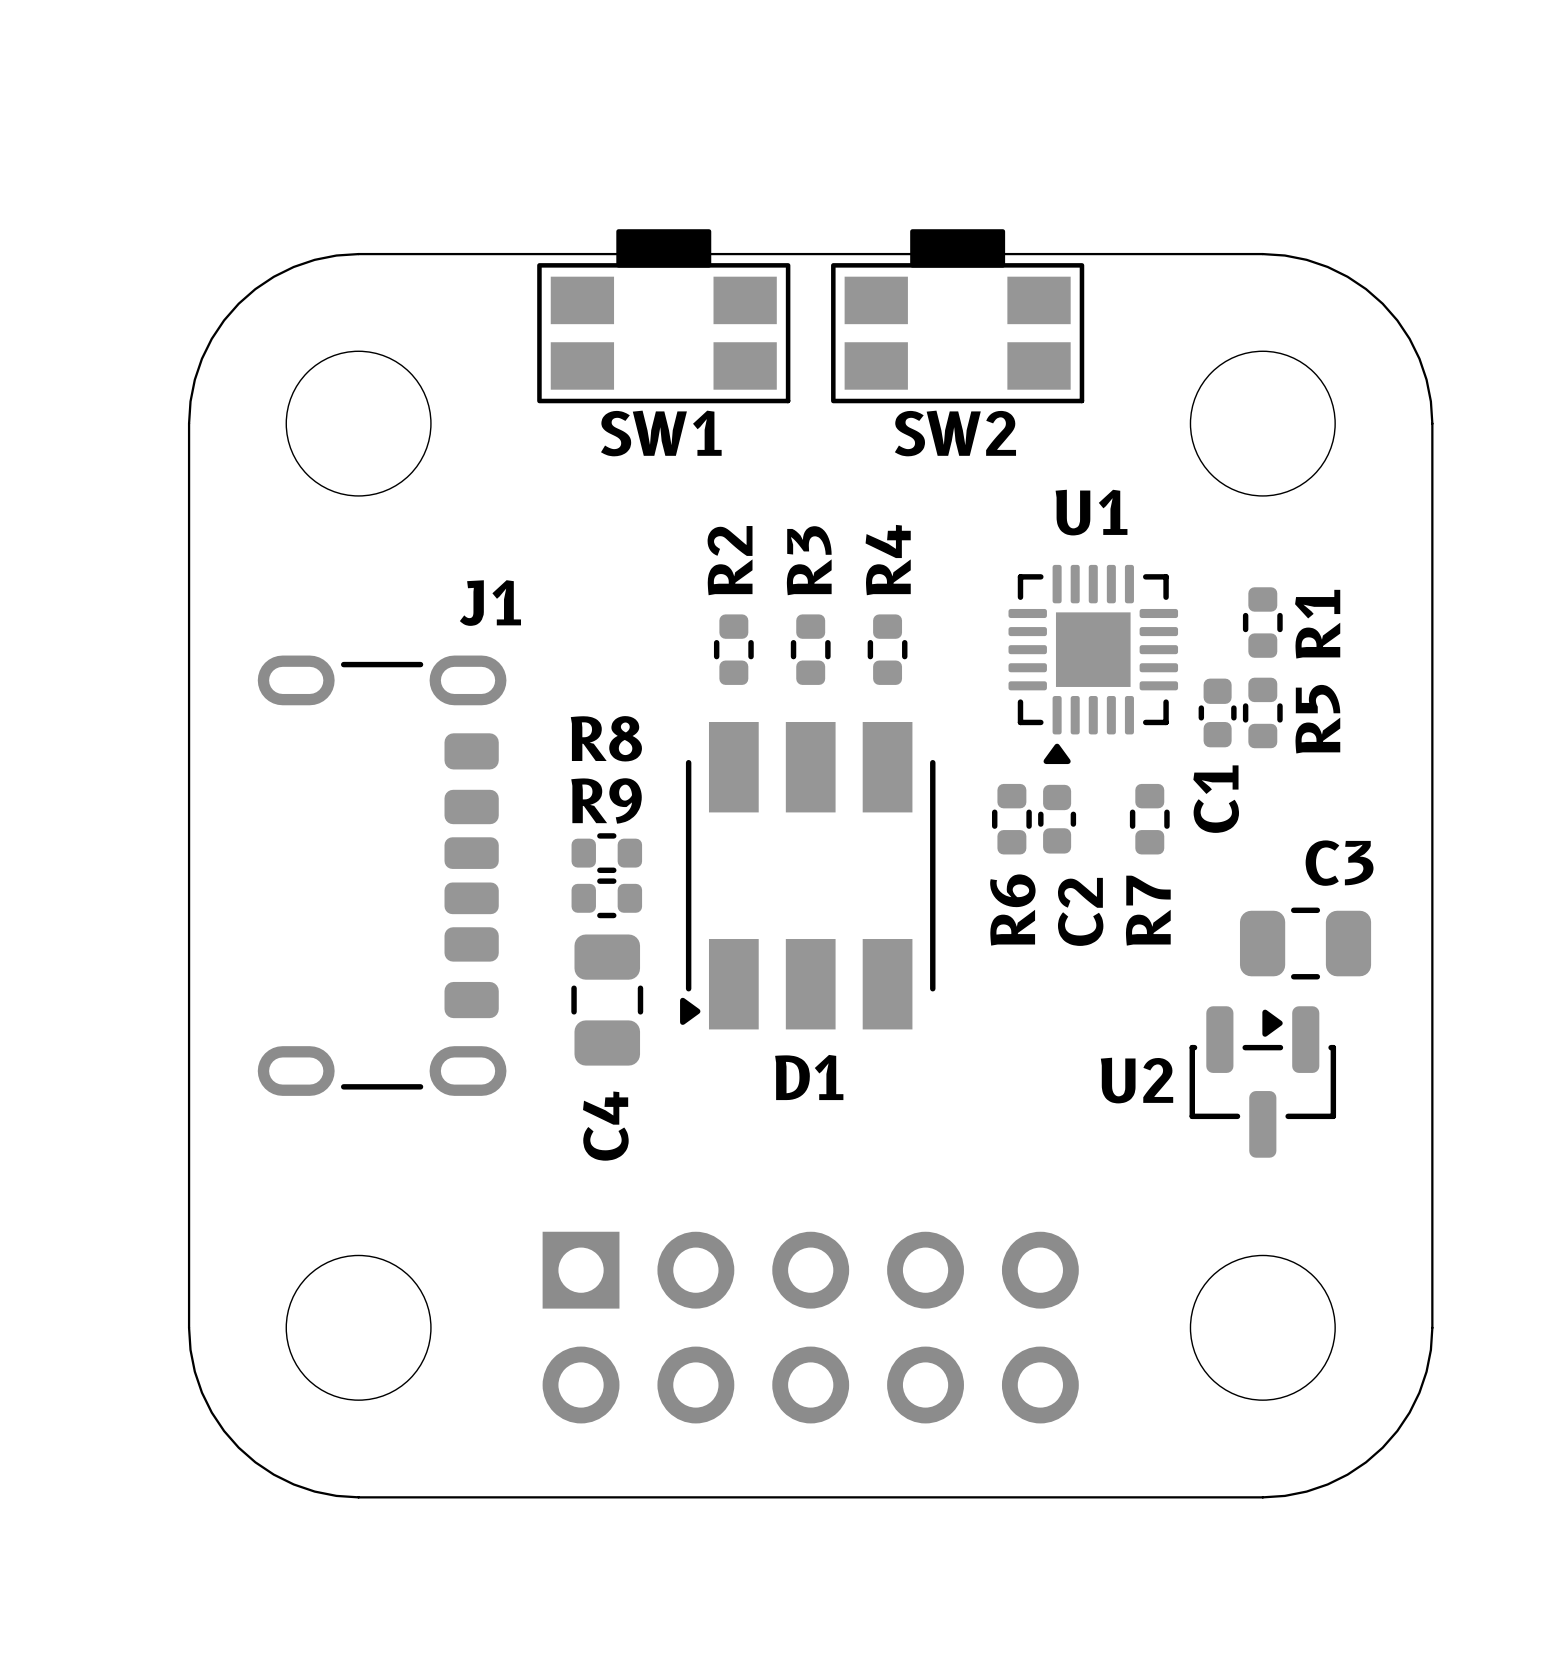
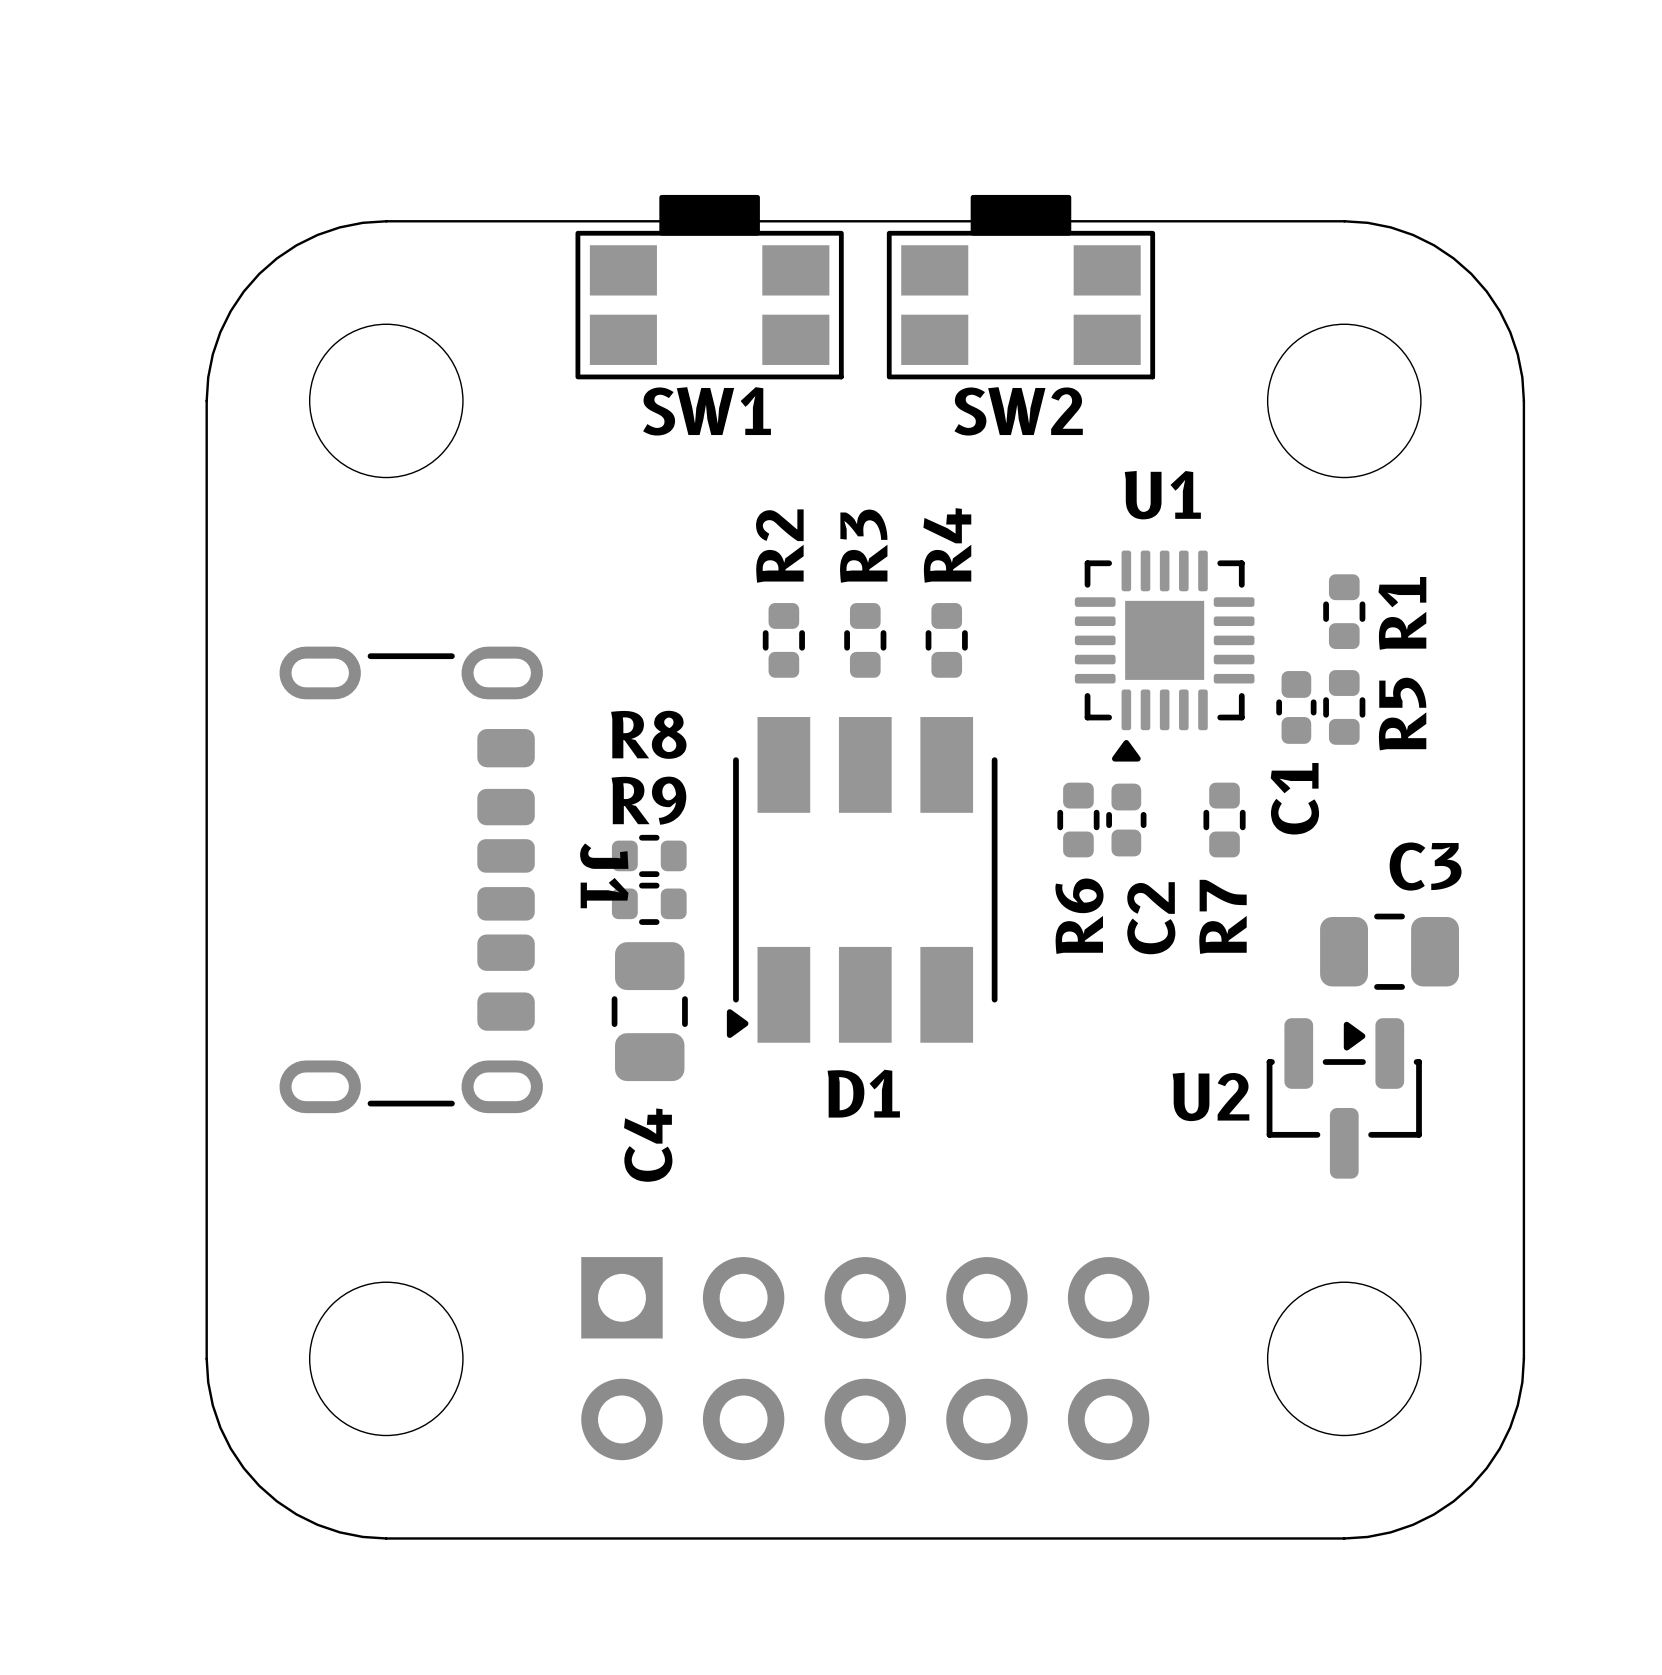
J1 name rotation: 0° (490, 603) -> 90° clockwise (604, 875)
J1 name position: J1 (490, 603) -> J1 (604, 875)

